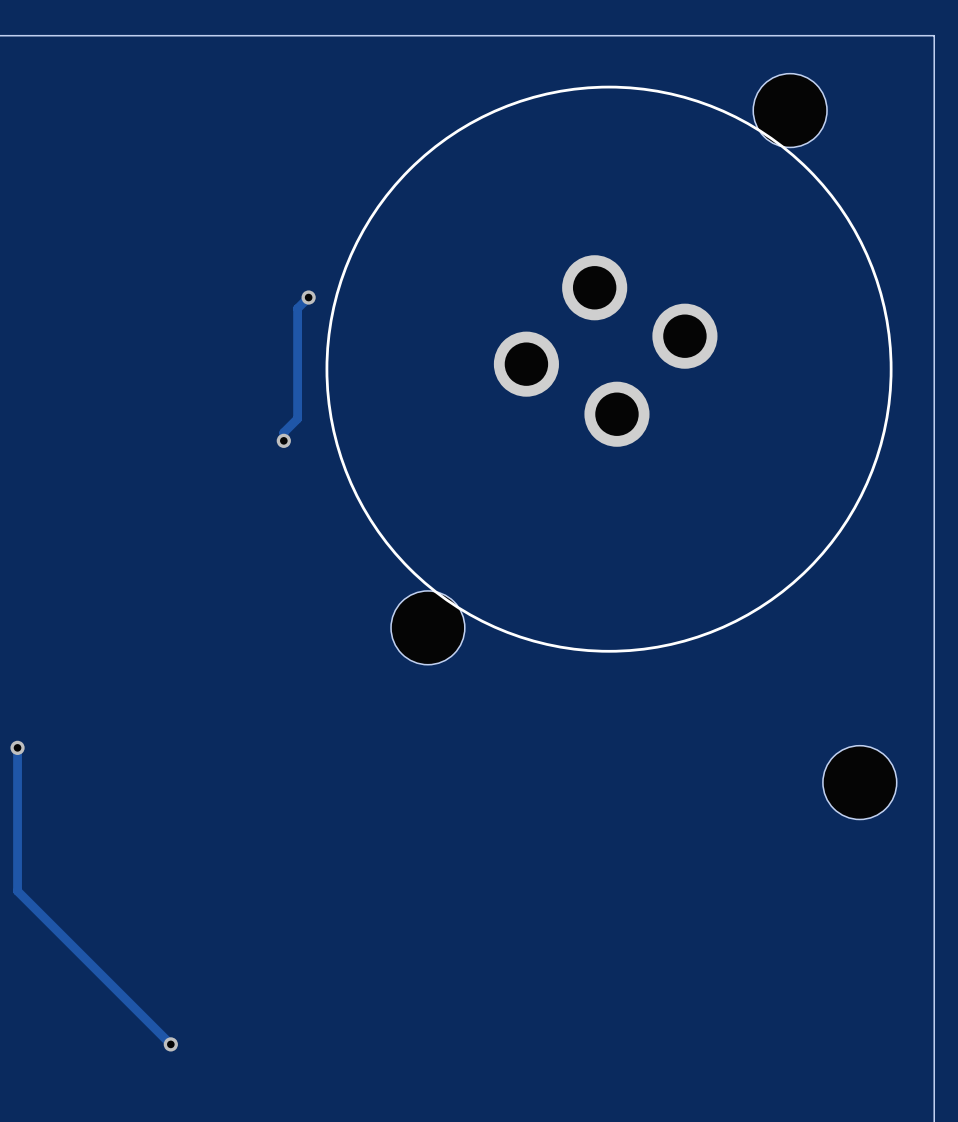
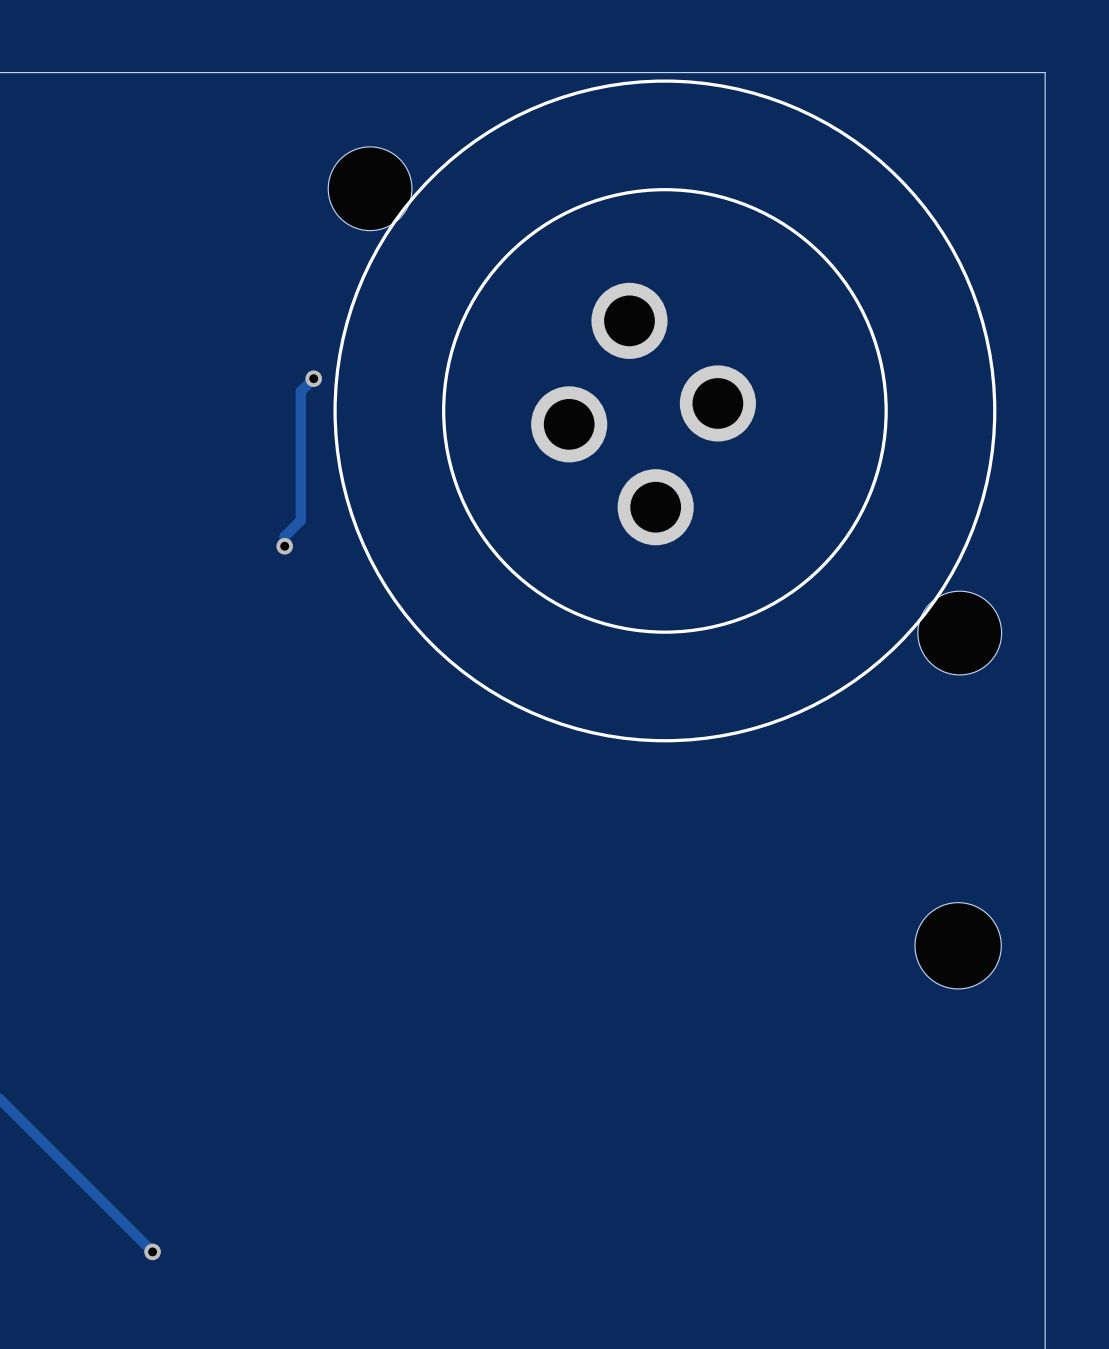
part: none -> (664, 410)
part: (609, 369) -> none

